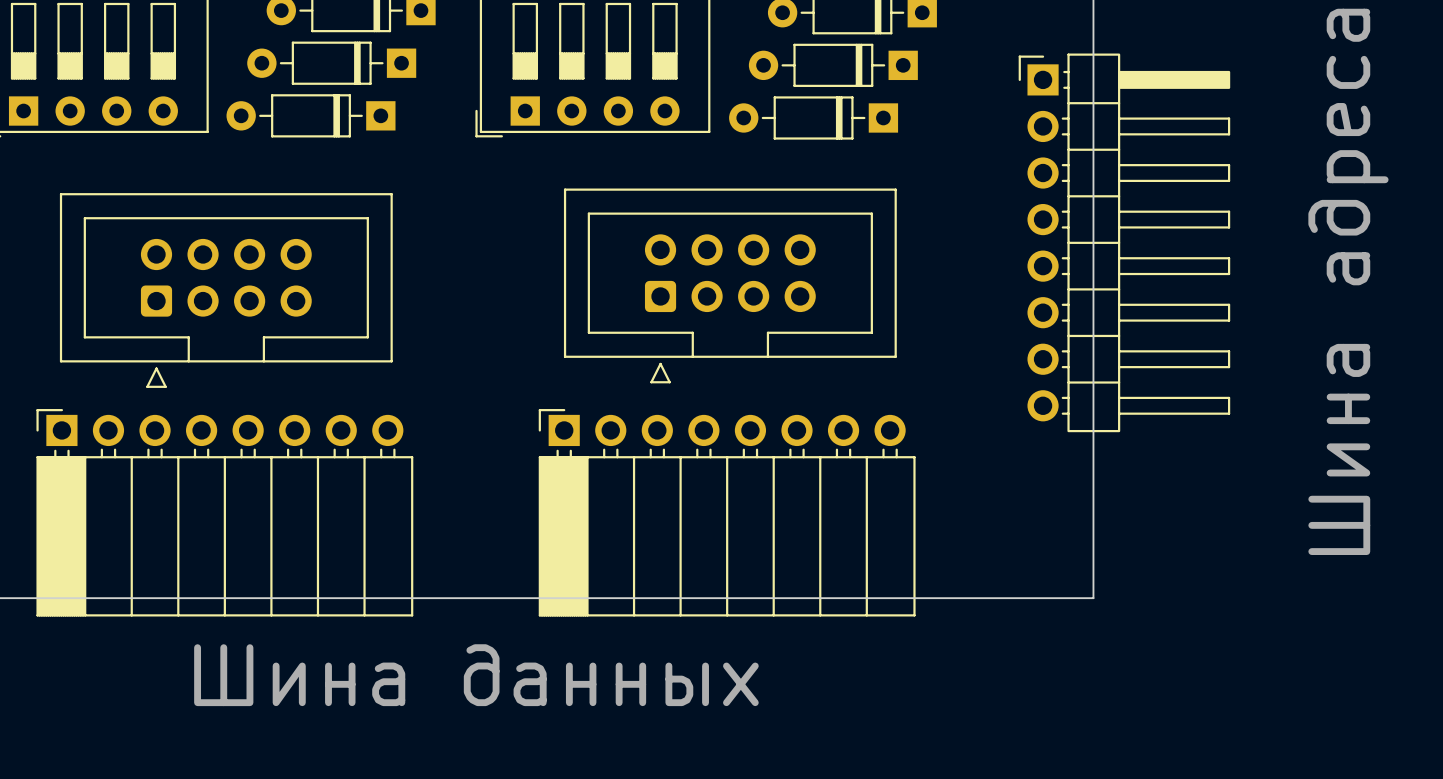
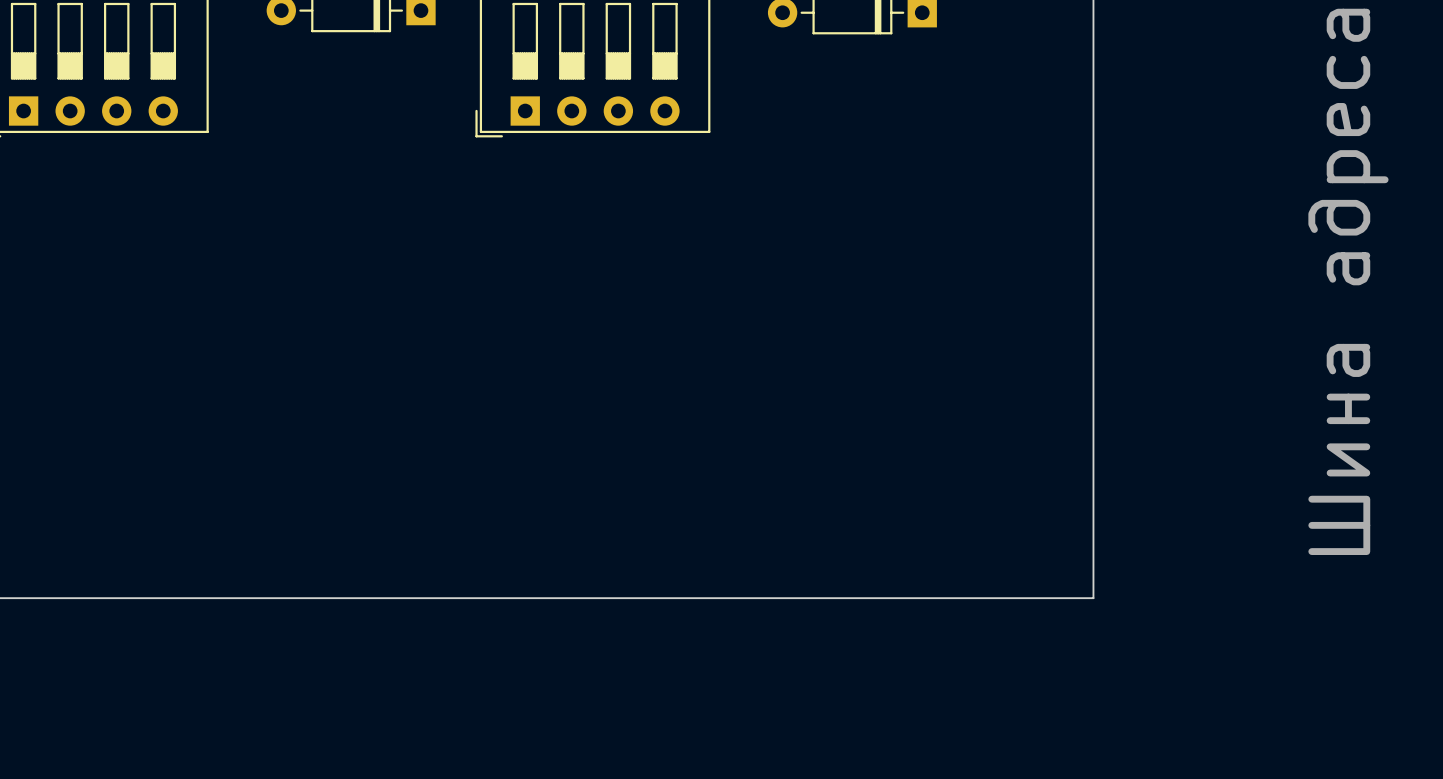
part: (331, 63) -> none
part: (833, 65) -> none
part: (311, 115) -> none
part: (813, 117) -> none
part: (1124, 242) -> none
part: (730, 285) -> none
part: (226, 290) -> none
part: (224, 512) -> none
part: (727, 512) -> none
text: Шина данных (476, 675) -> none

